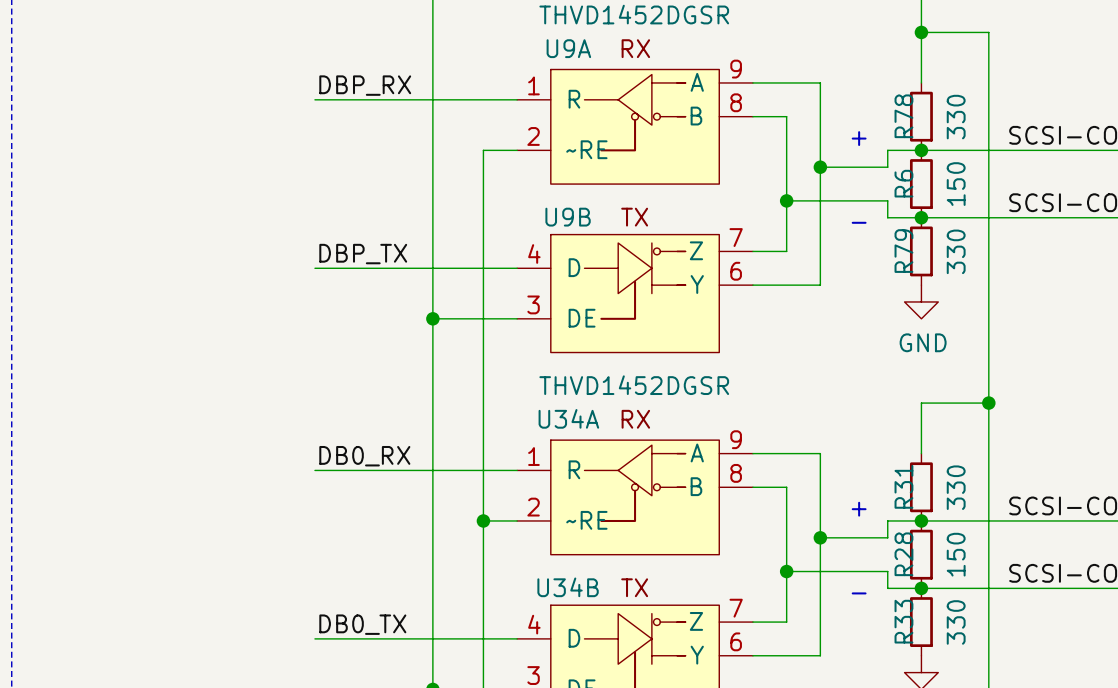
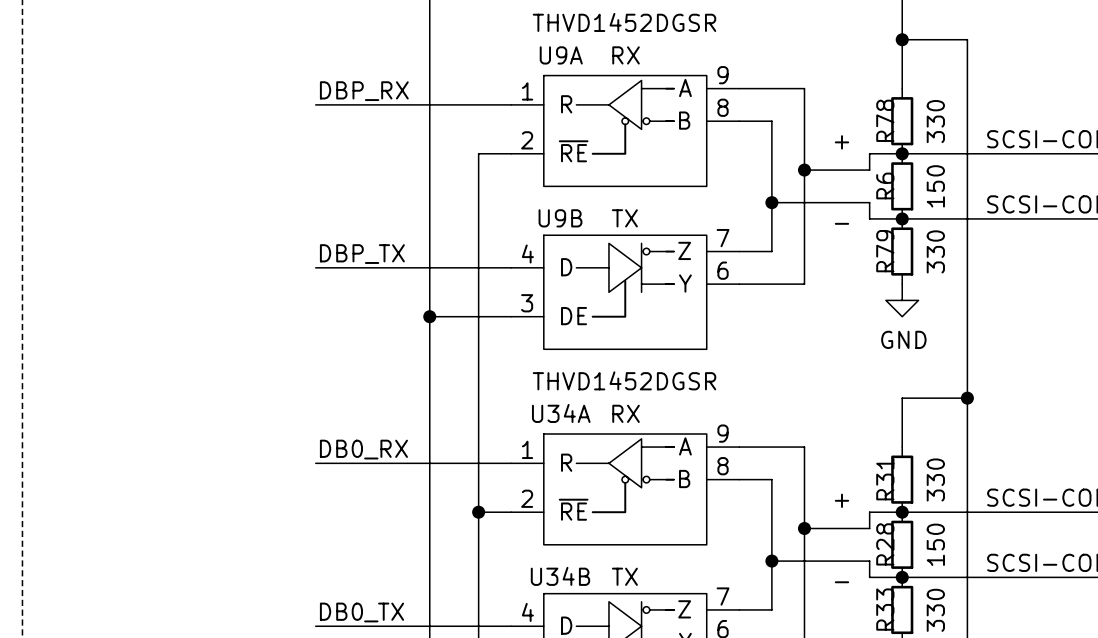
U9A pin name: ~RE (586, 149) -> ~{RE} (573, 151)
U34A pin name: ~RE (586, 520) -> ~{RE} (573, 509)

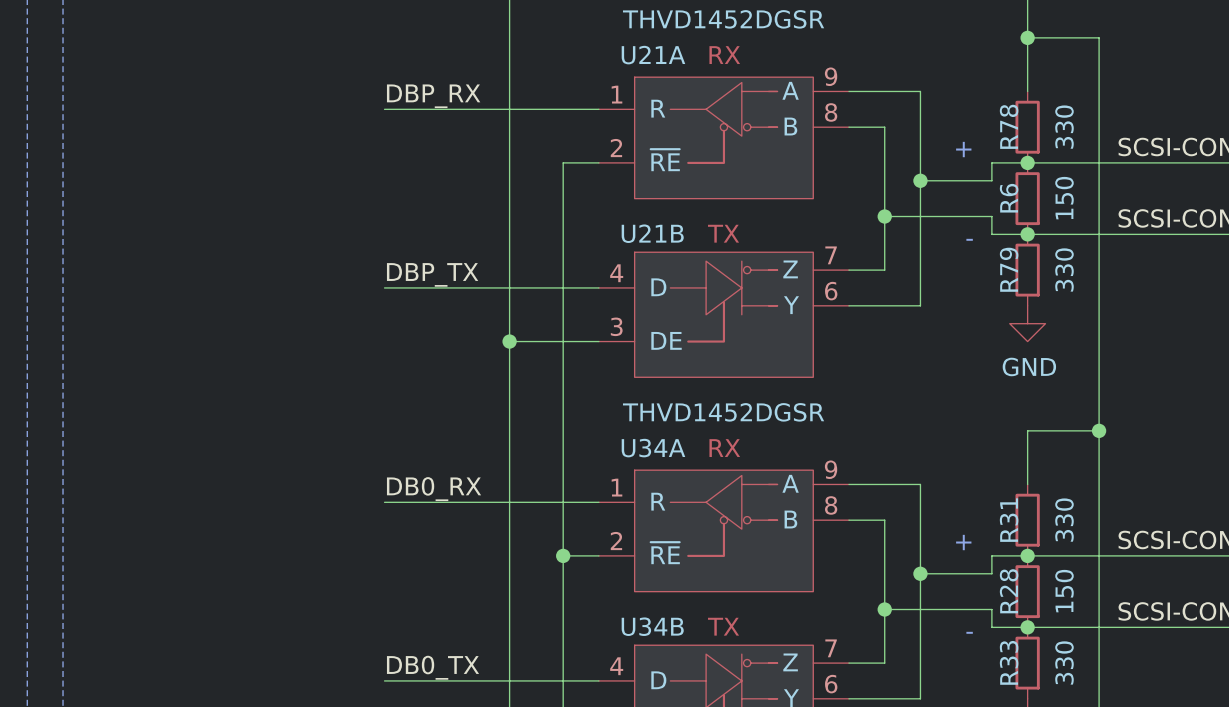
U9A name: U9A (561, 55) -> U21A (653, 55)
U9B name: U9B (560, 218) -> U21B (652, 233)

